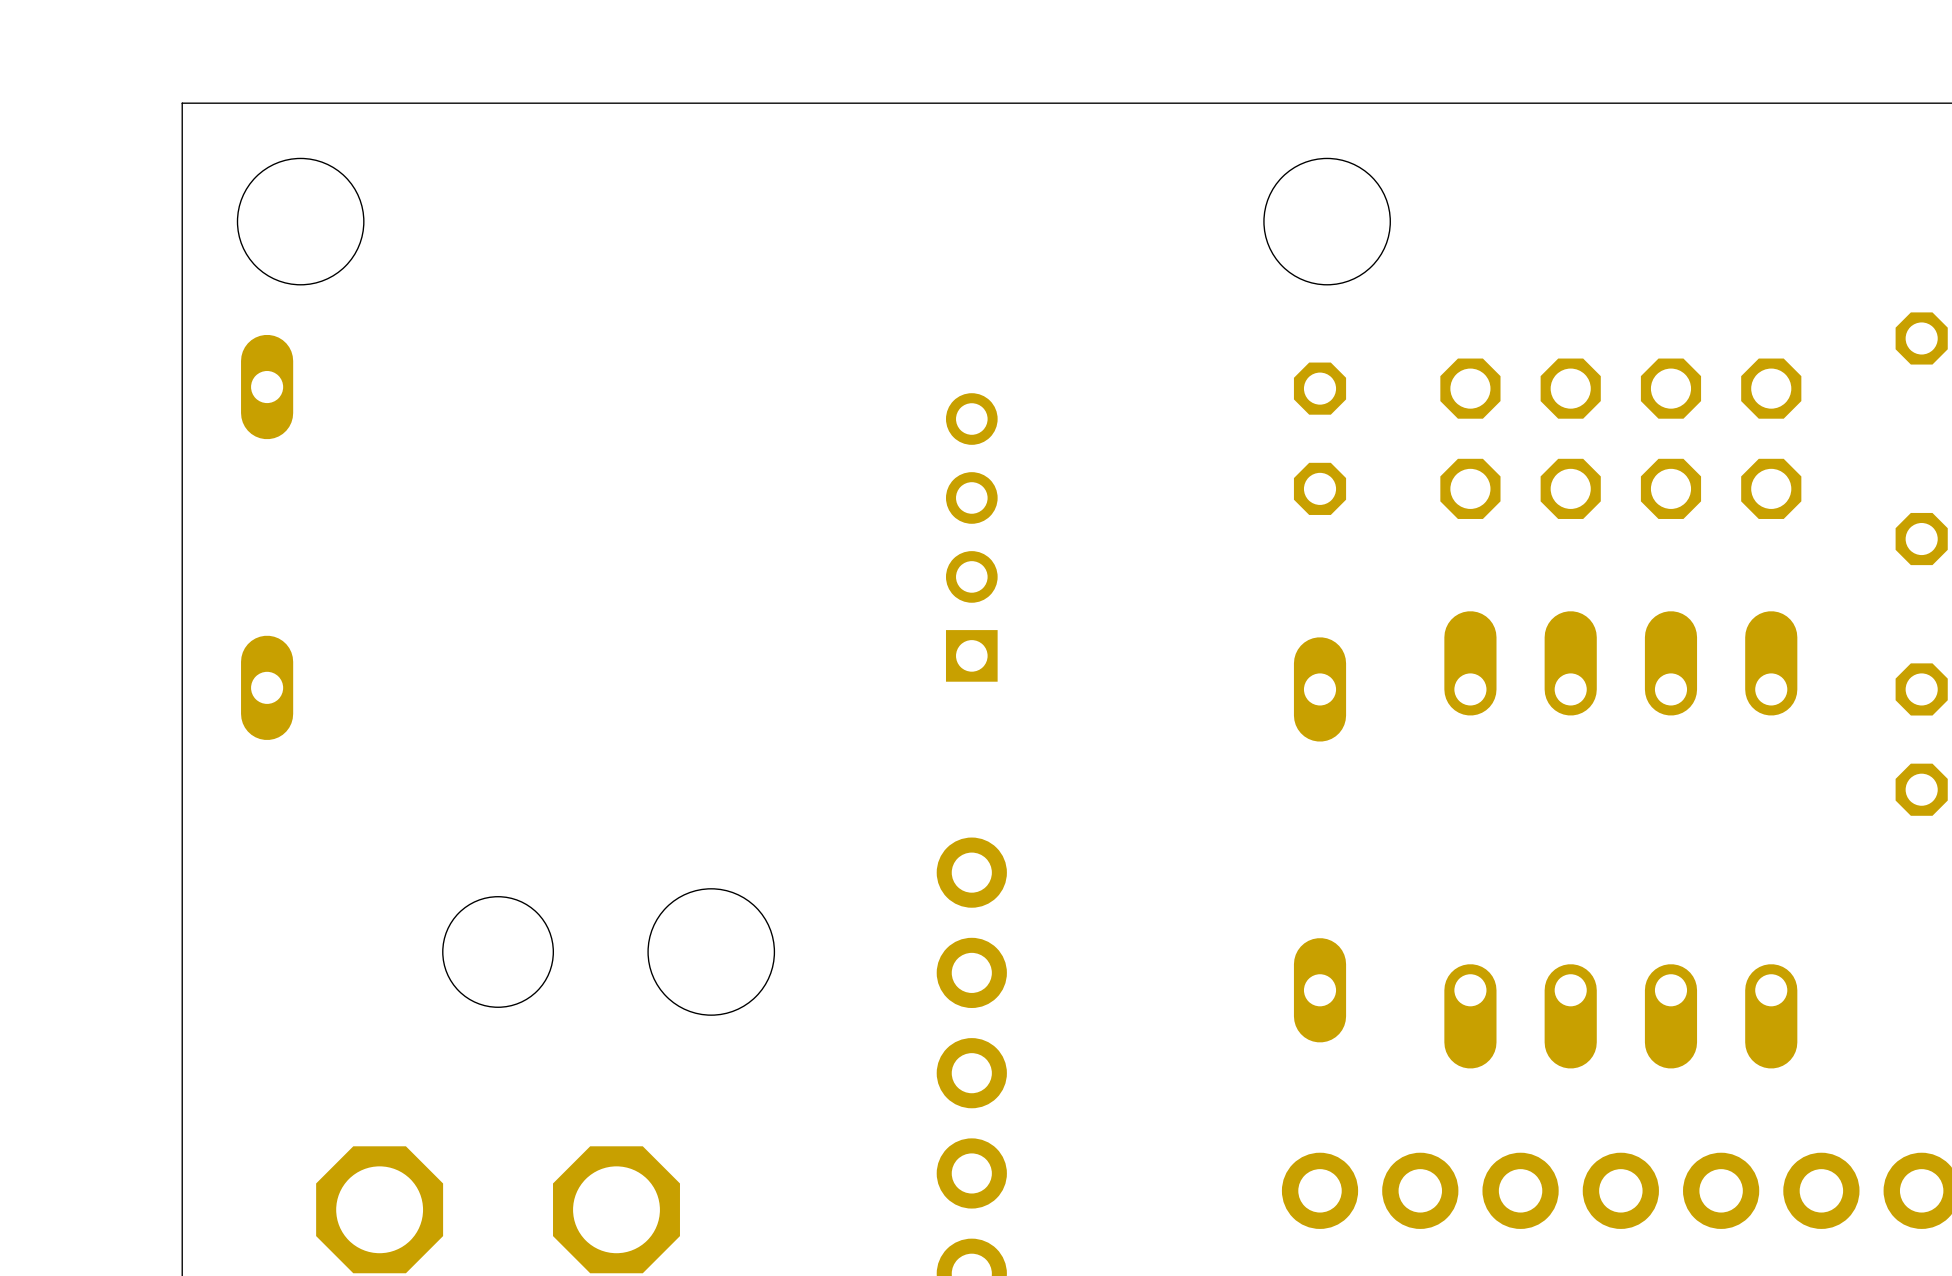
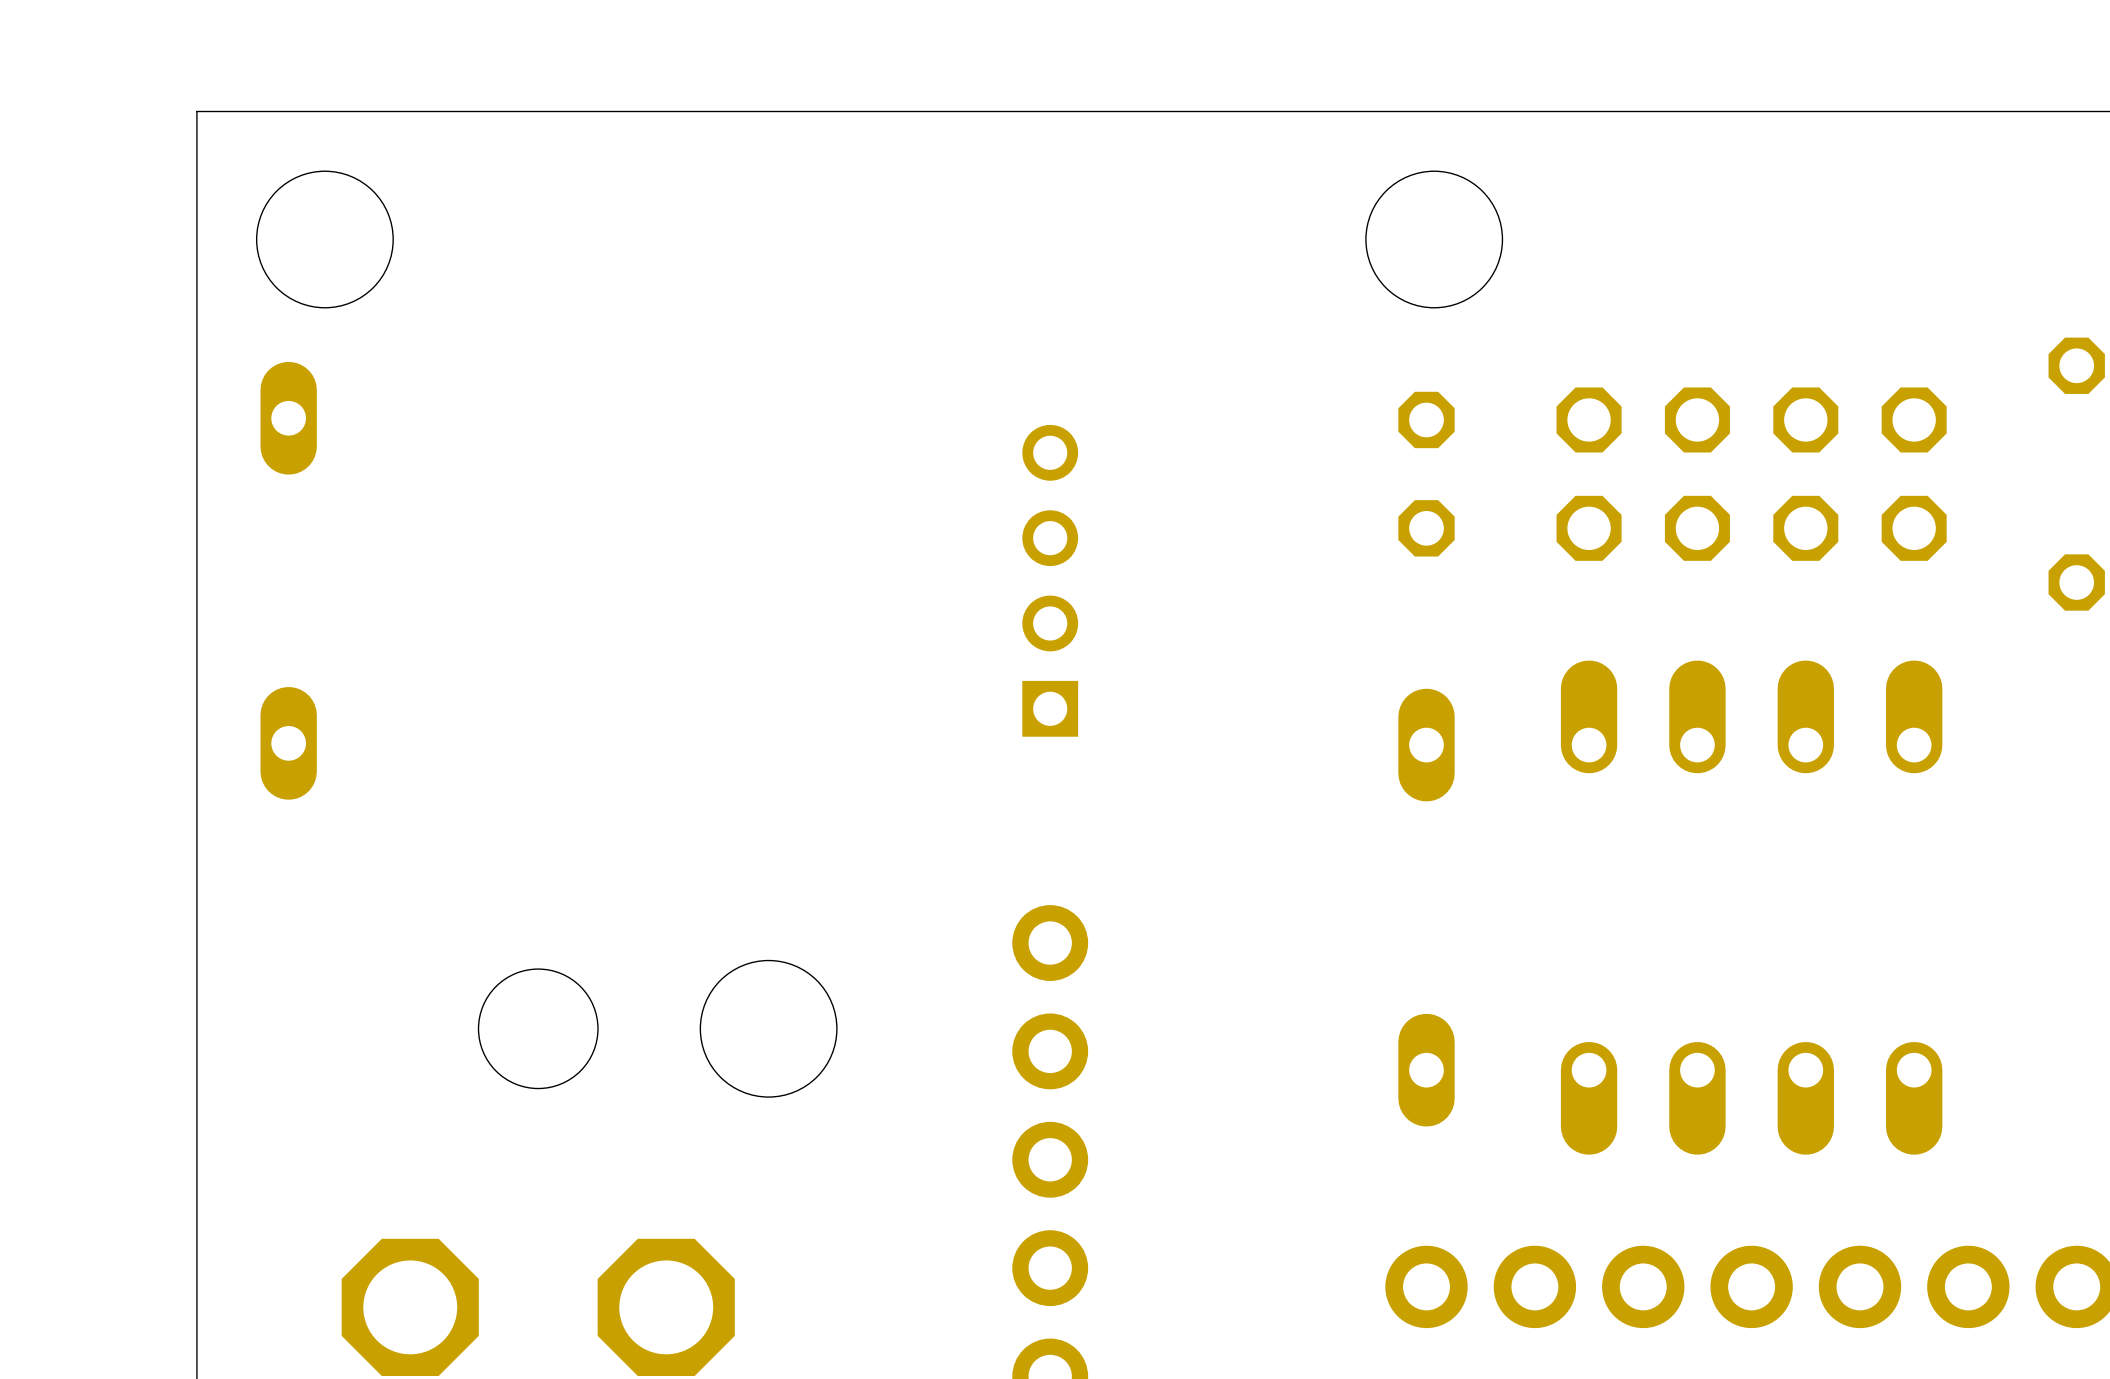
part: (1921, 739) -> none

